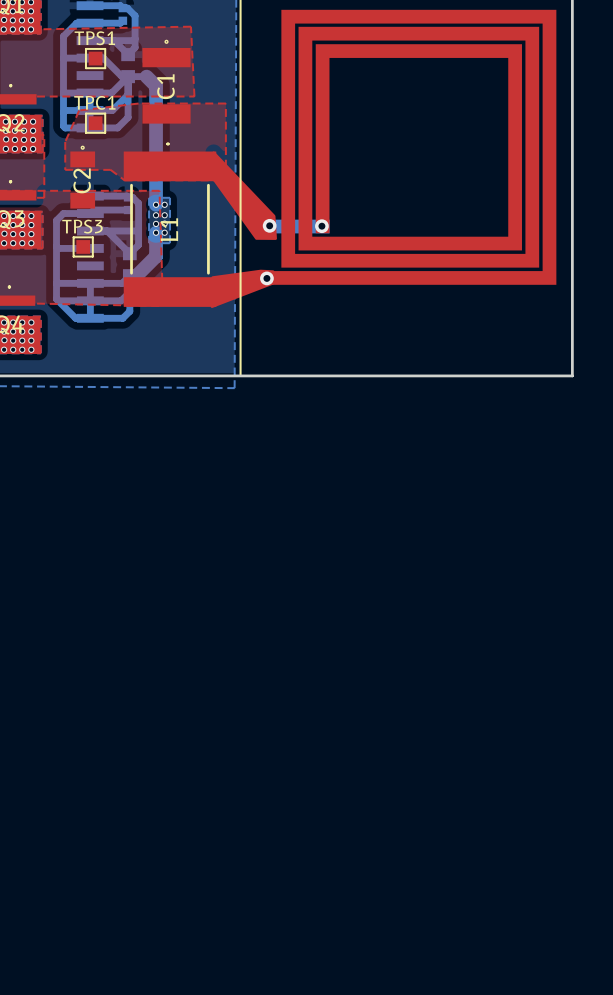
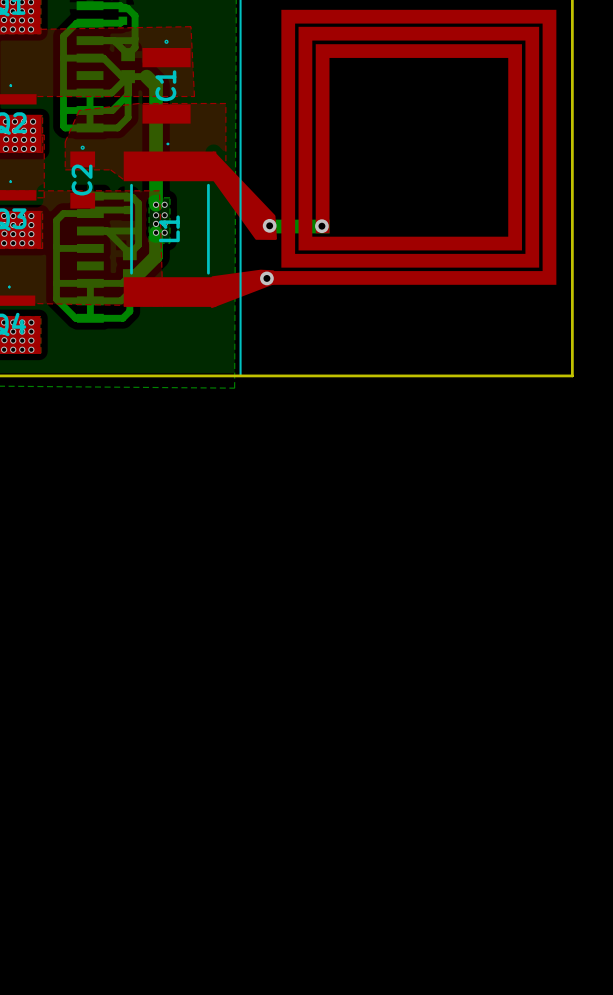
TPS1: (95, 58) -> none
TPC1: (95, 123) -> none
TPS3: (83, 246) -> none

